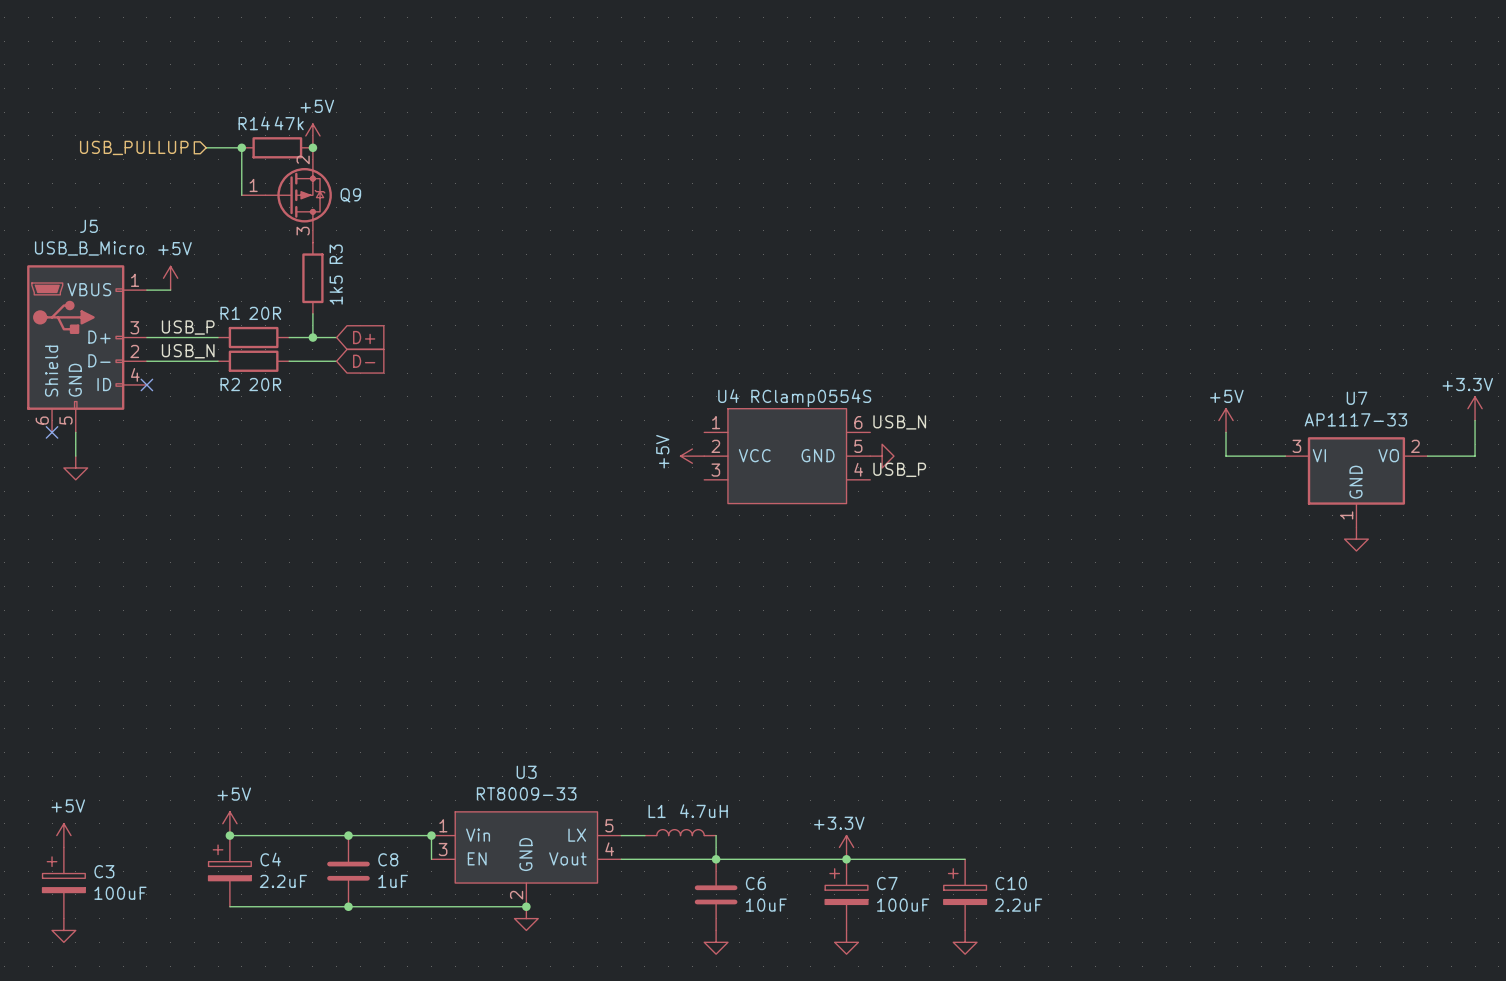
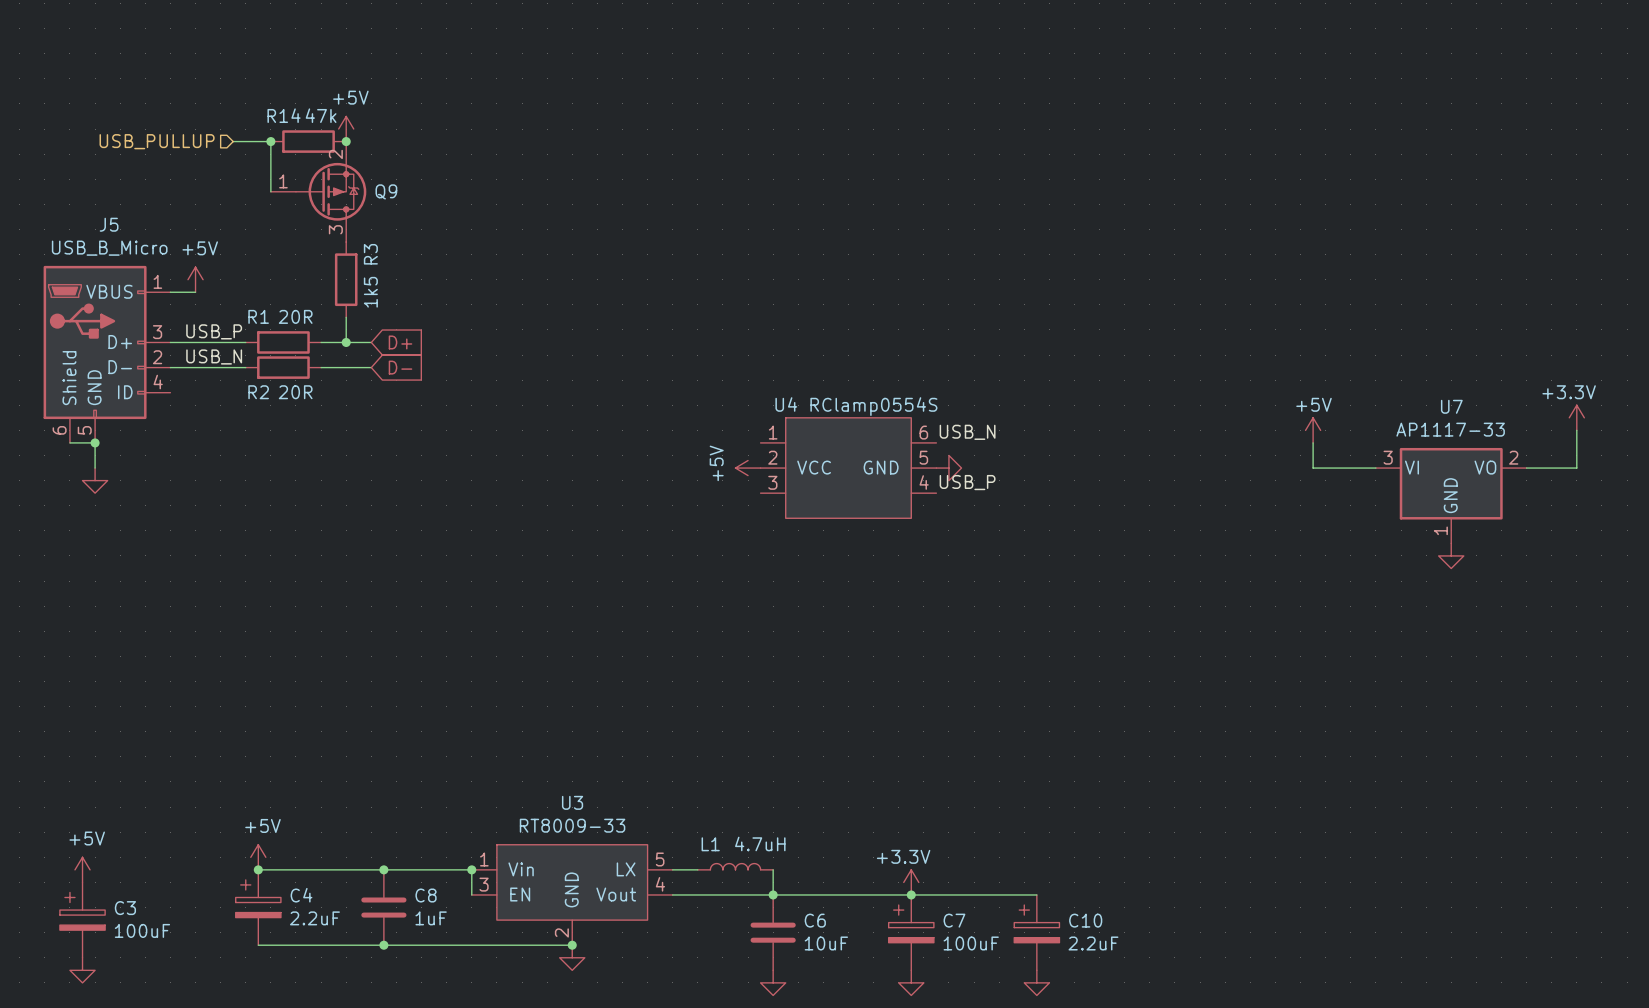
no-connect mark: (146, 384) -> none
wire: none -> (69, 442) (95, 442)
no-connect mark: (52, 432) -> none
junction: none -> (95, 442)

